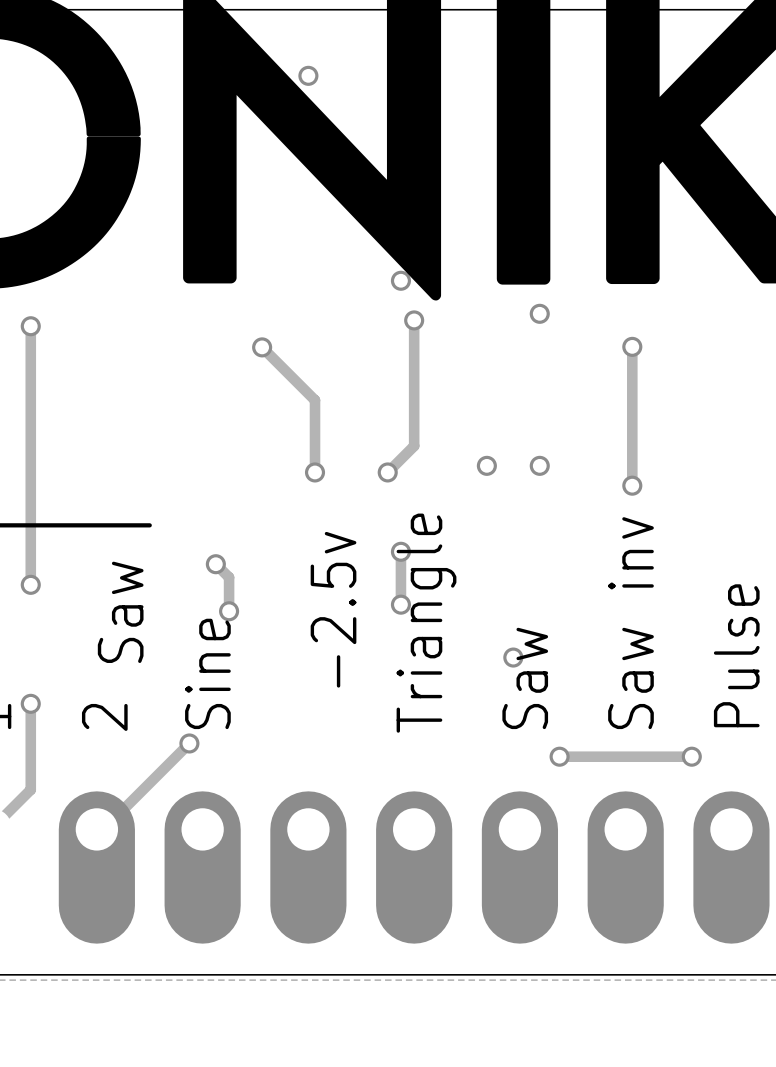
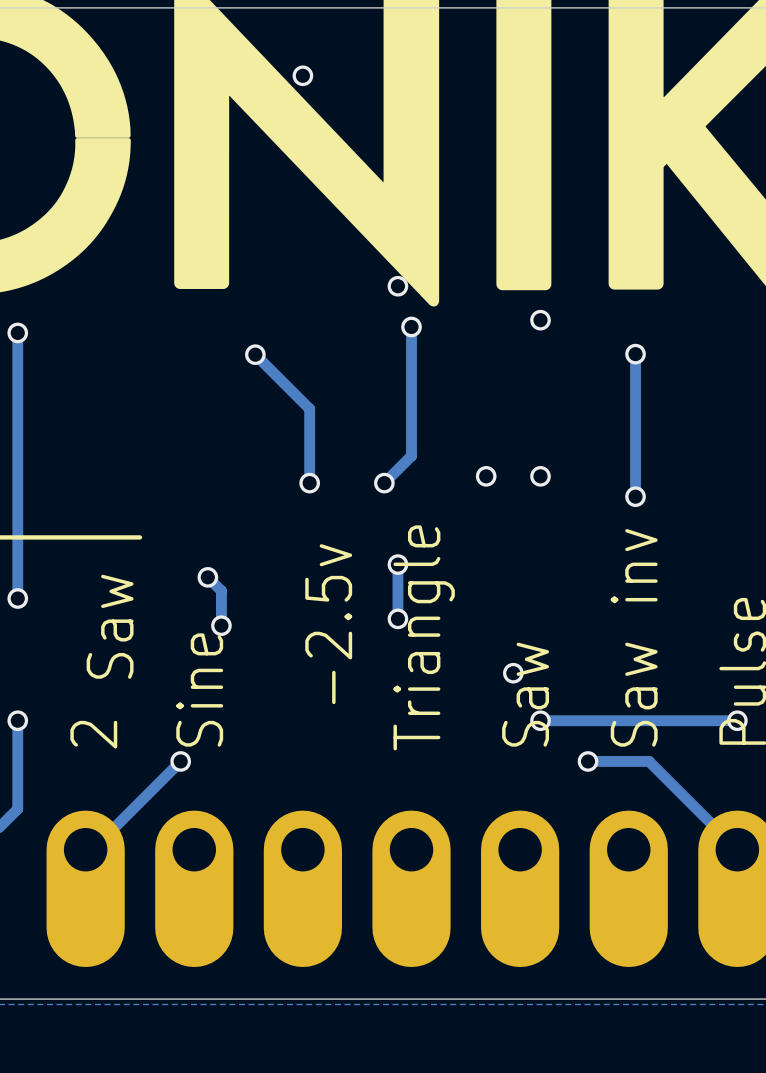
via: none -> (540, 720)
track: none -> (737, 720) (540, 720)
via: none -> (737, 720)
track: none -> (588, 761) (649, 761) (737, 849)
via: none -> (588, 761)
via: (559, 756) -> none
track: (691, 756) (559, 756) -> none
via: (691, 756) -> none

